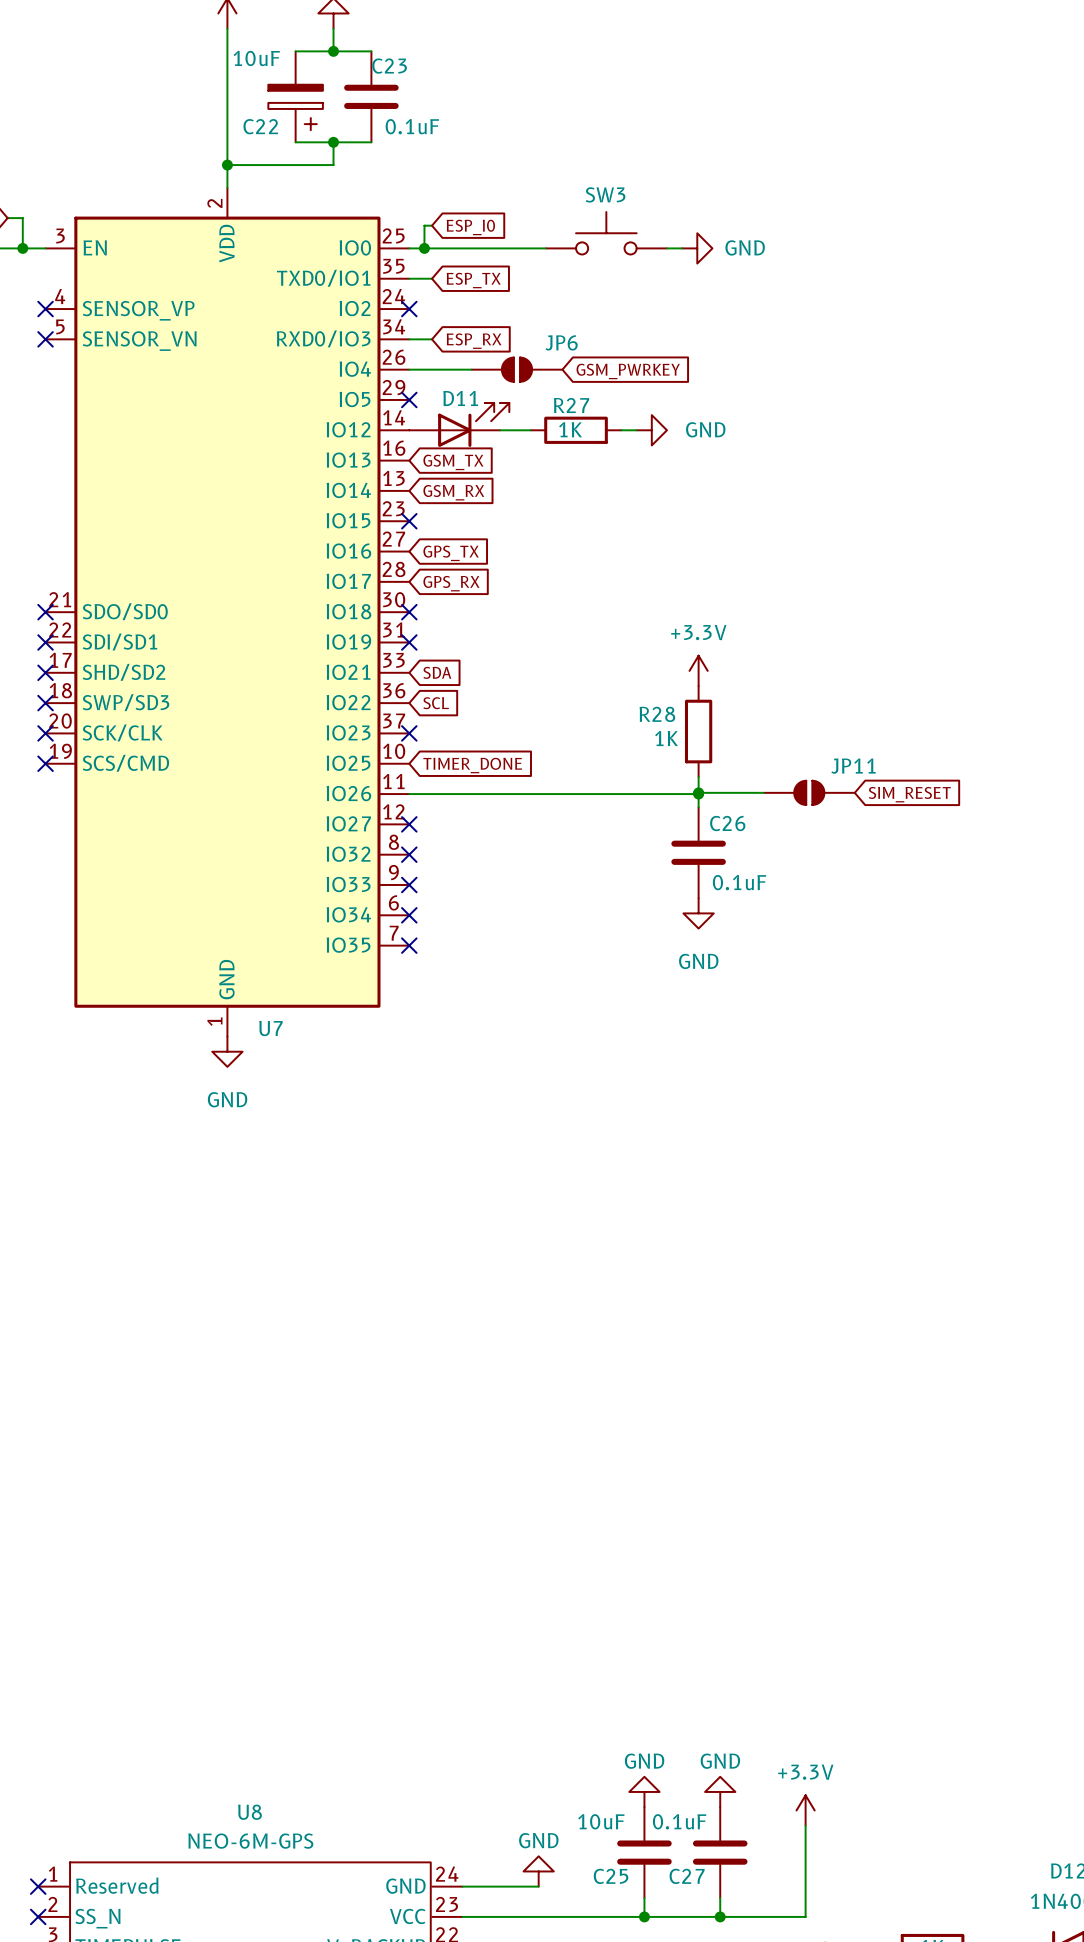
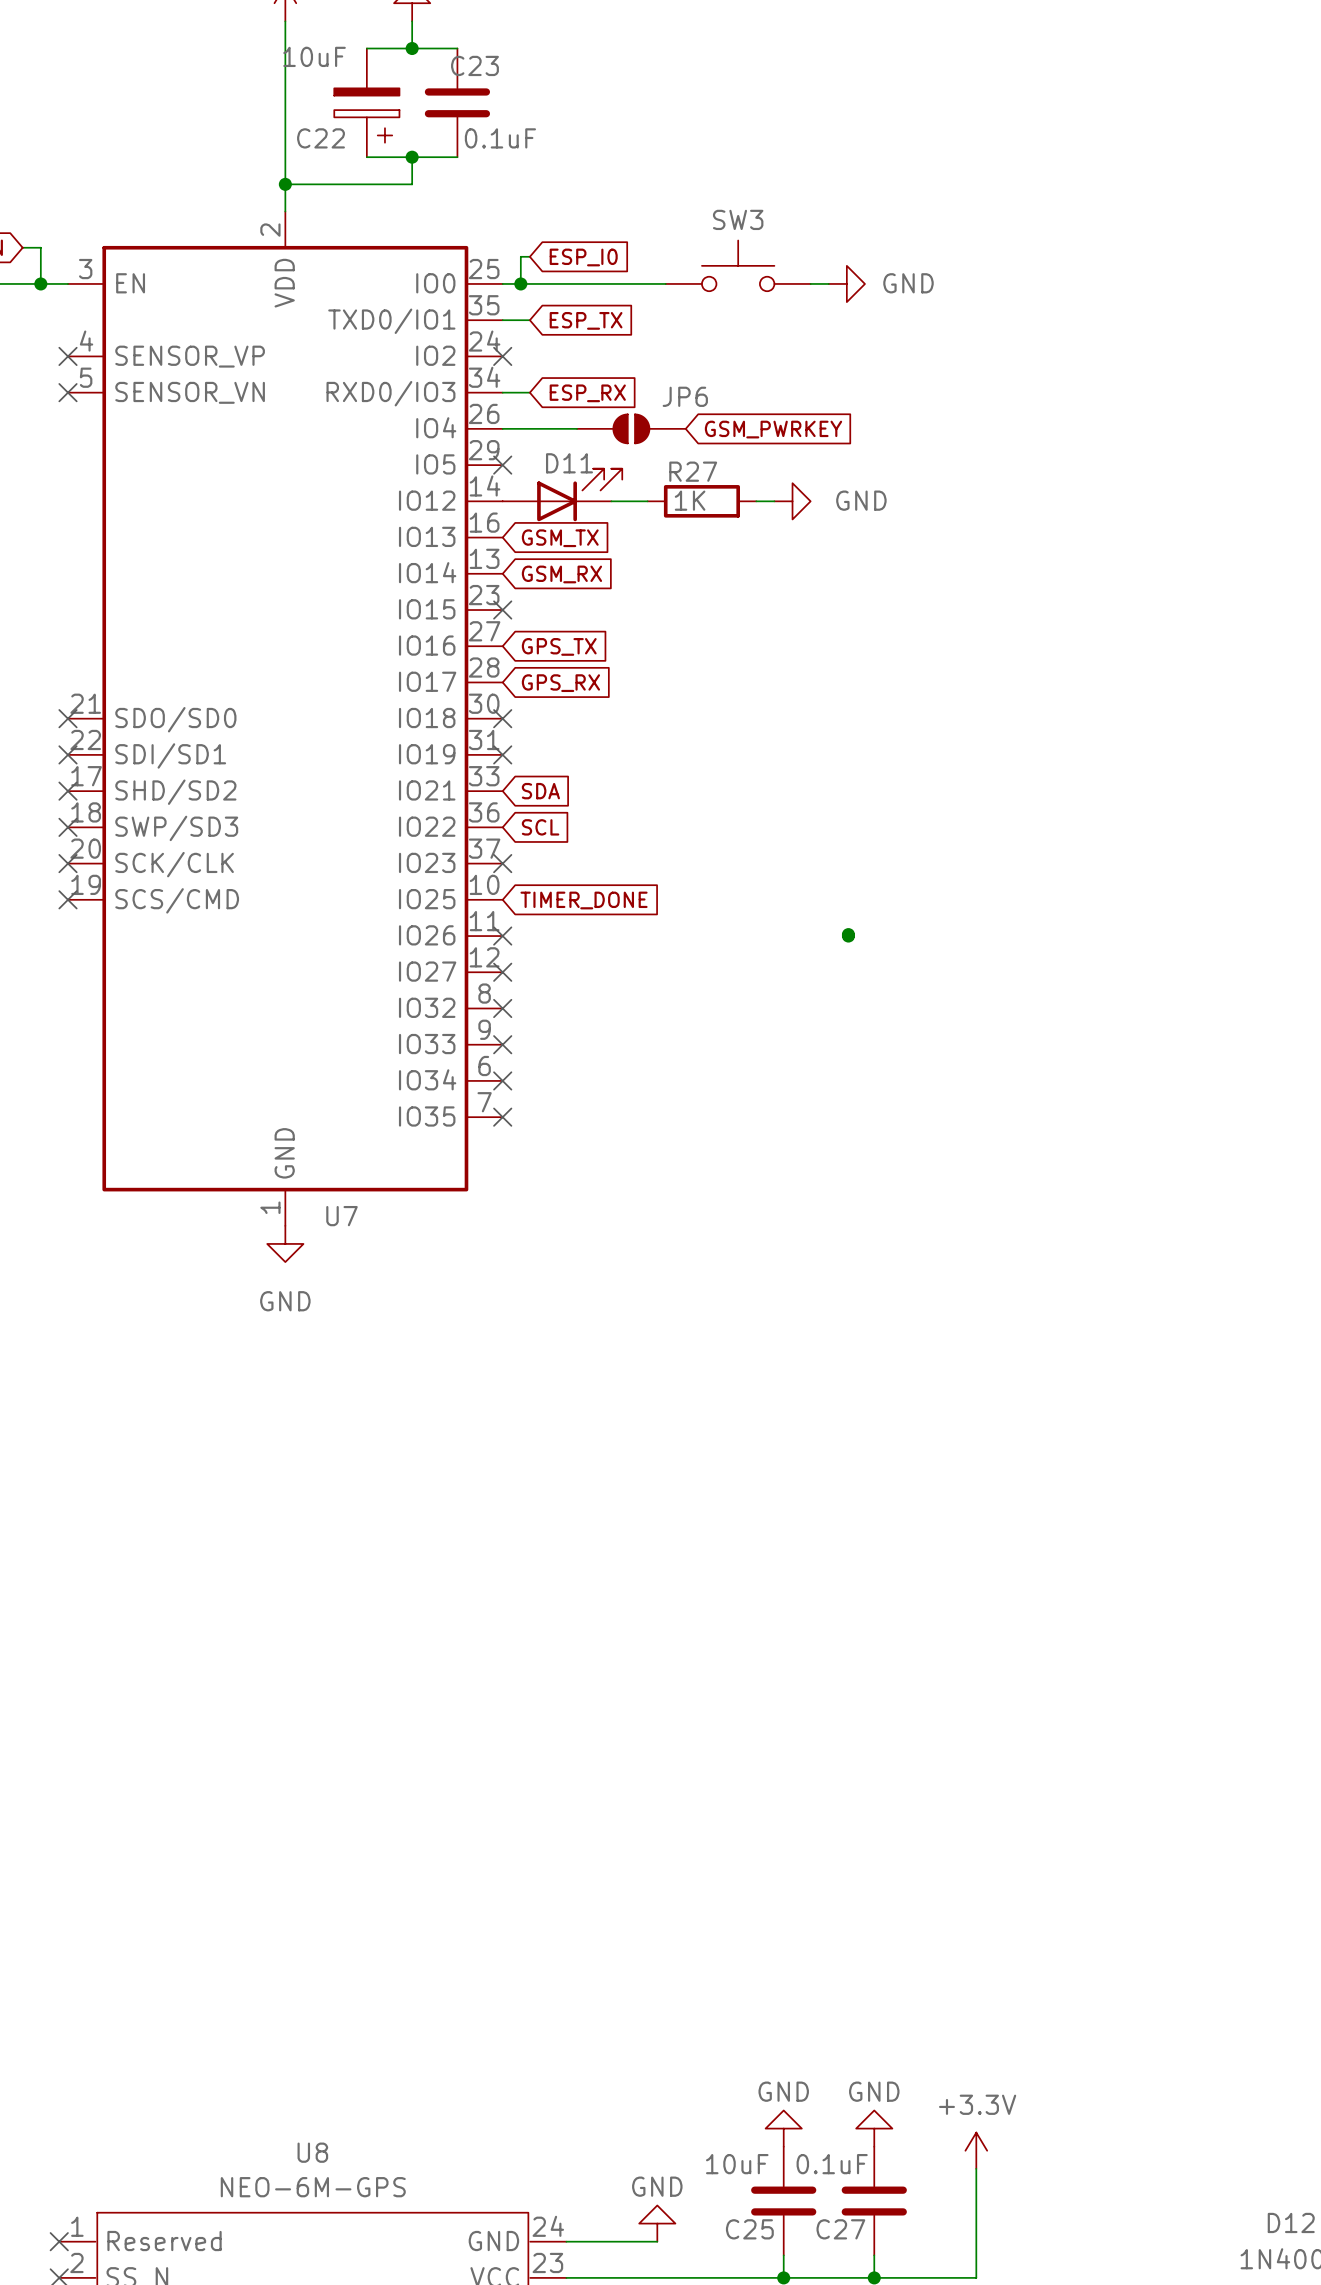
power symbol: +3.3V (698, 670) -> none
R28: 1K (698, 731) -> none
wire: (698, 776) (698, 807) -> none
wire: (698, 792) (763, 792) -> none
JP11: (809, 792) -> none
wire: (409, 794) (698, 794) -> none
no-connect mark: none -> (502, 936)
global label: SIM_RESET (909, 794) -> none
C26: 0.1uF (698, 852) -> none
power symbol: GND (698, 913) -> none

